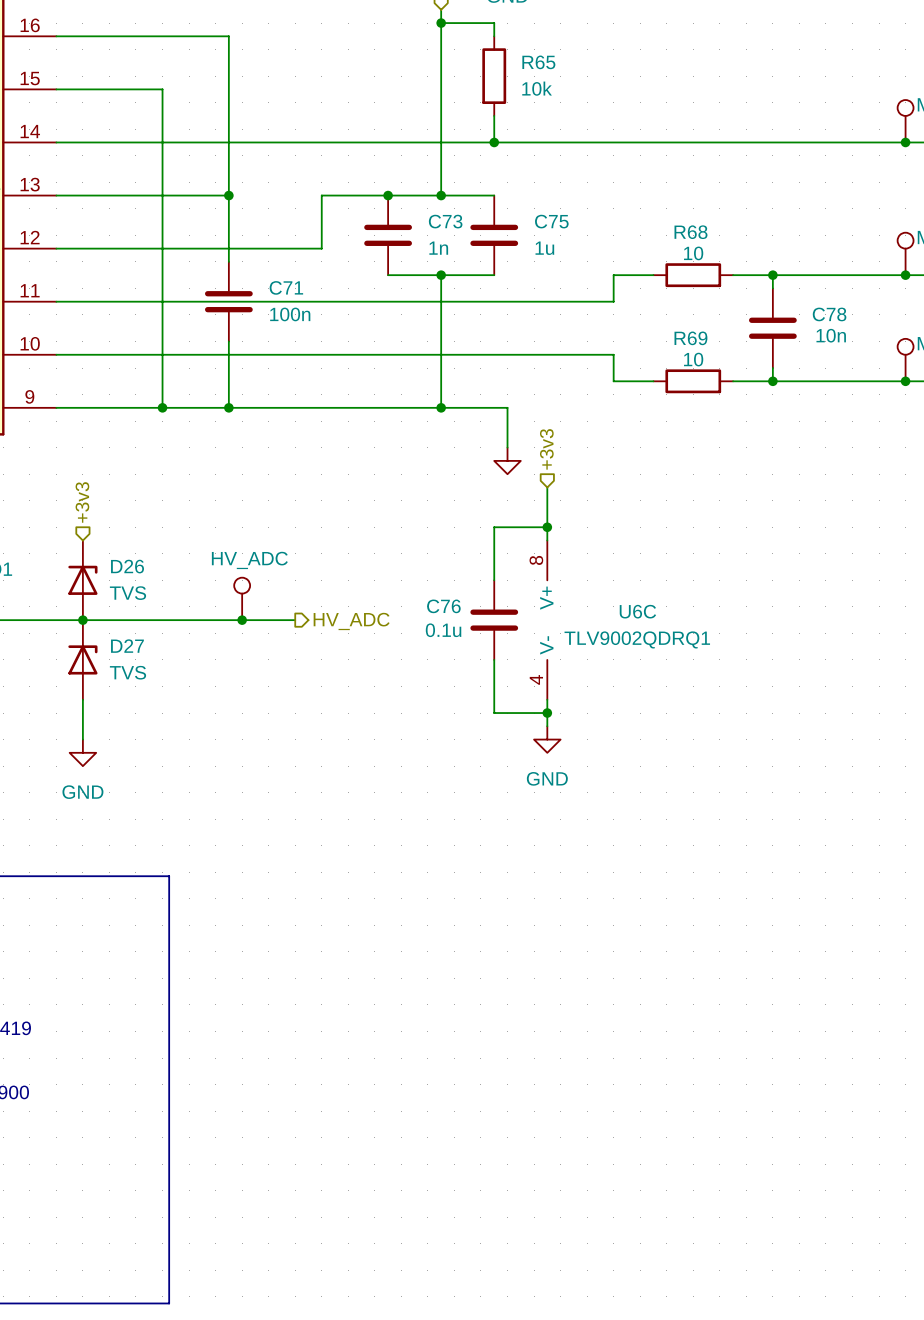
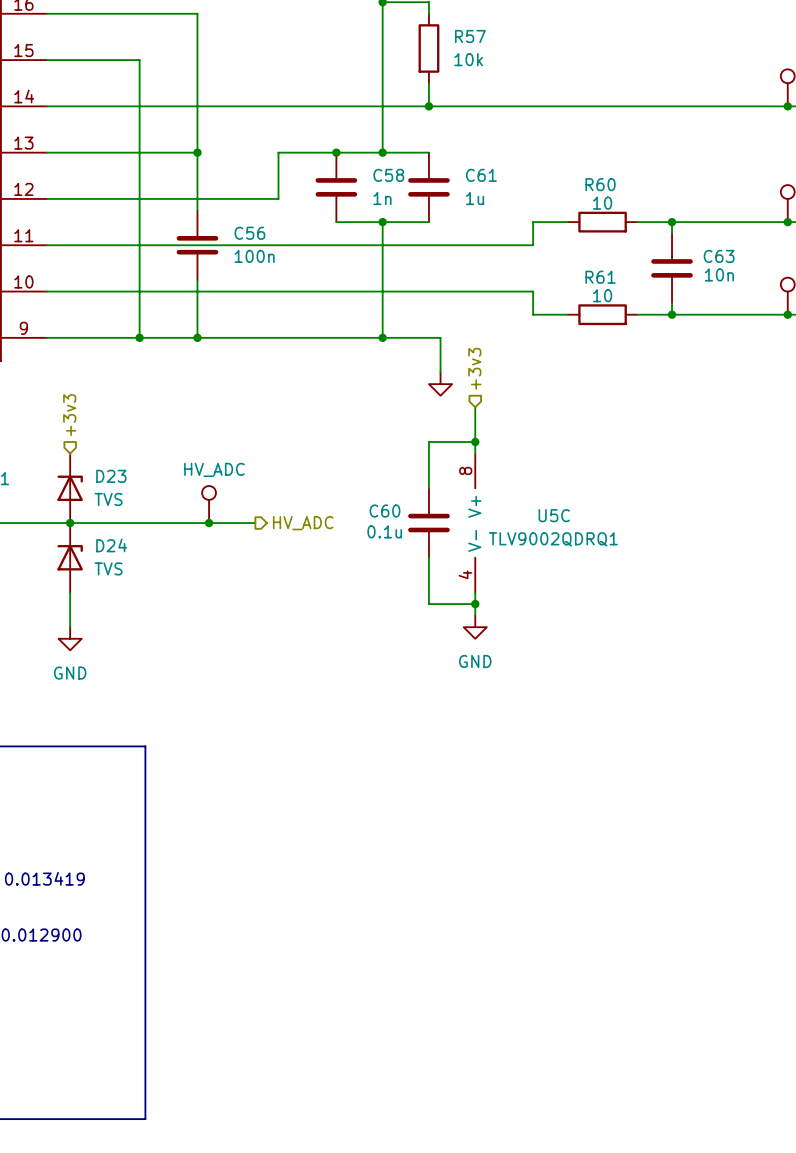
R65 name: R65 (538, 62) -> R57 (470, 36)
C73 name: C73 (445, 221) -> C58 (388, 175)
C75 name: C75 (551, 221) -> C61 (481, 175)
R68 name: R68 (690, 232) -> R60 (600, 184)
C71 name: C71 (286, 287) -> C56 (249, 233)
C78 name: C78 (829, 314) -> C63 (719, 256)
R69 name: R69 (690, 338) -> R61 (600, 277)
D26 name: D26 (127, 566) -> D23 (111, 476)
C76 name: C76 (443, 606) -> C60 (384, 511)
U6C name: U6C (637, 611) -> U5C (554, 515)
D27 name: D27 (127, 646) -> D24 (111, 545)

